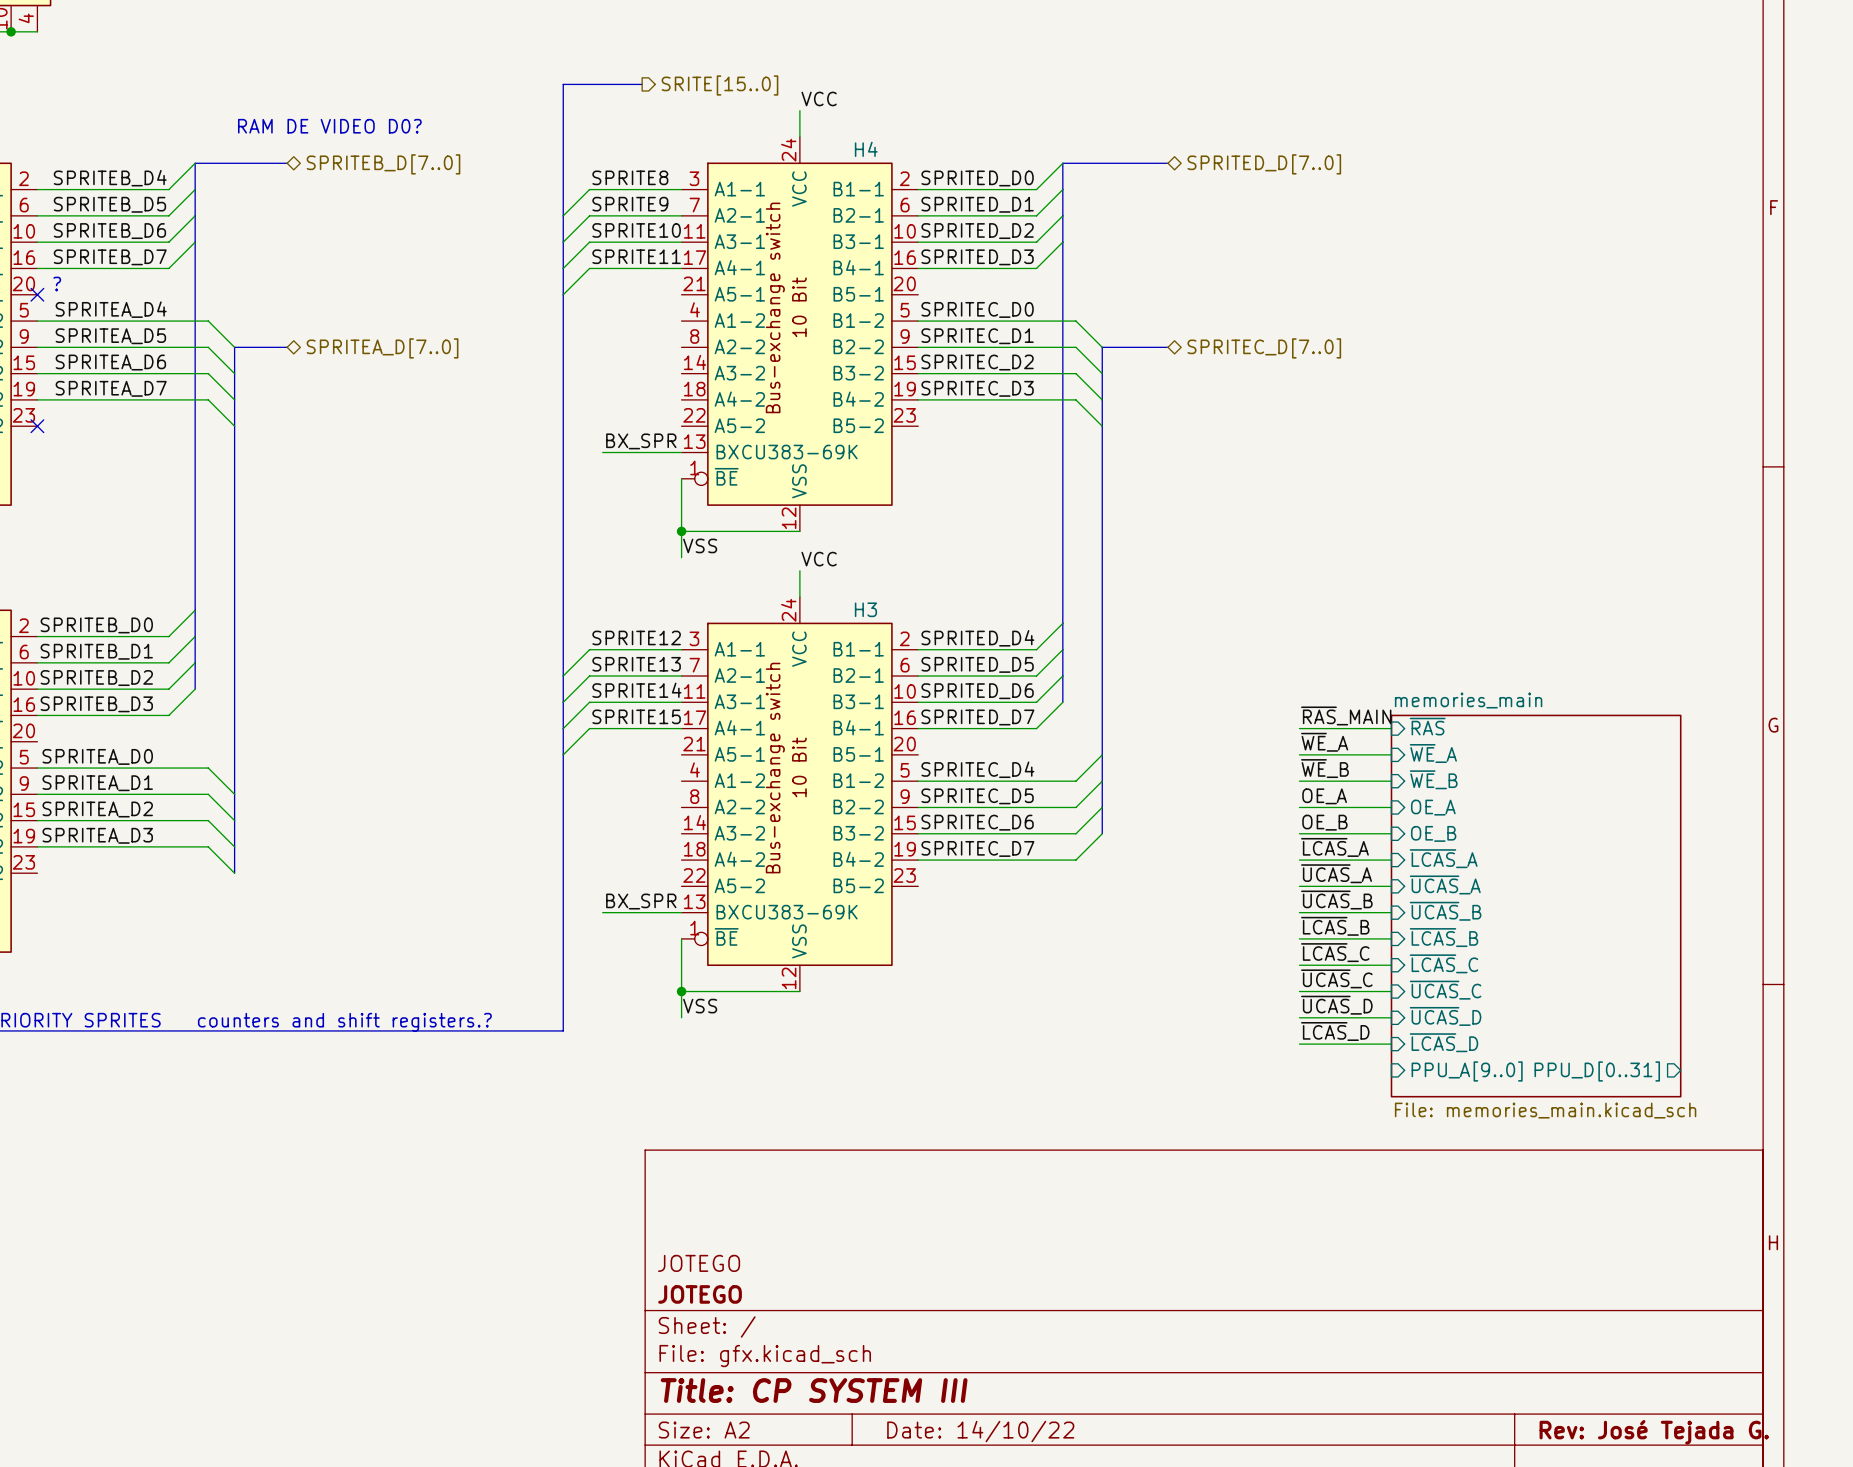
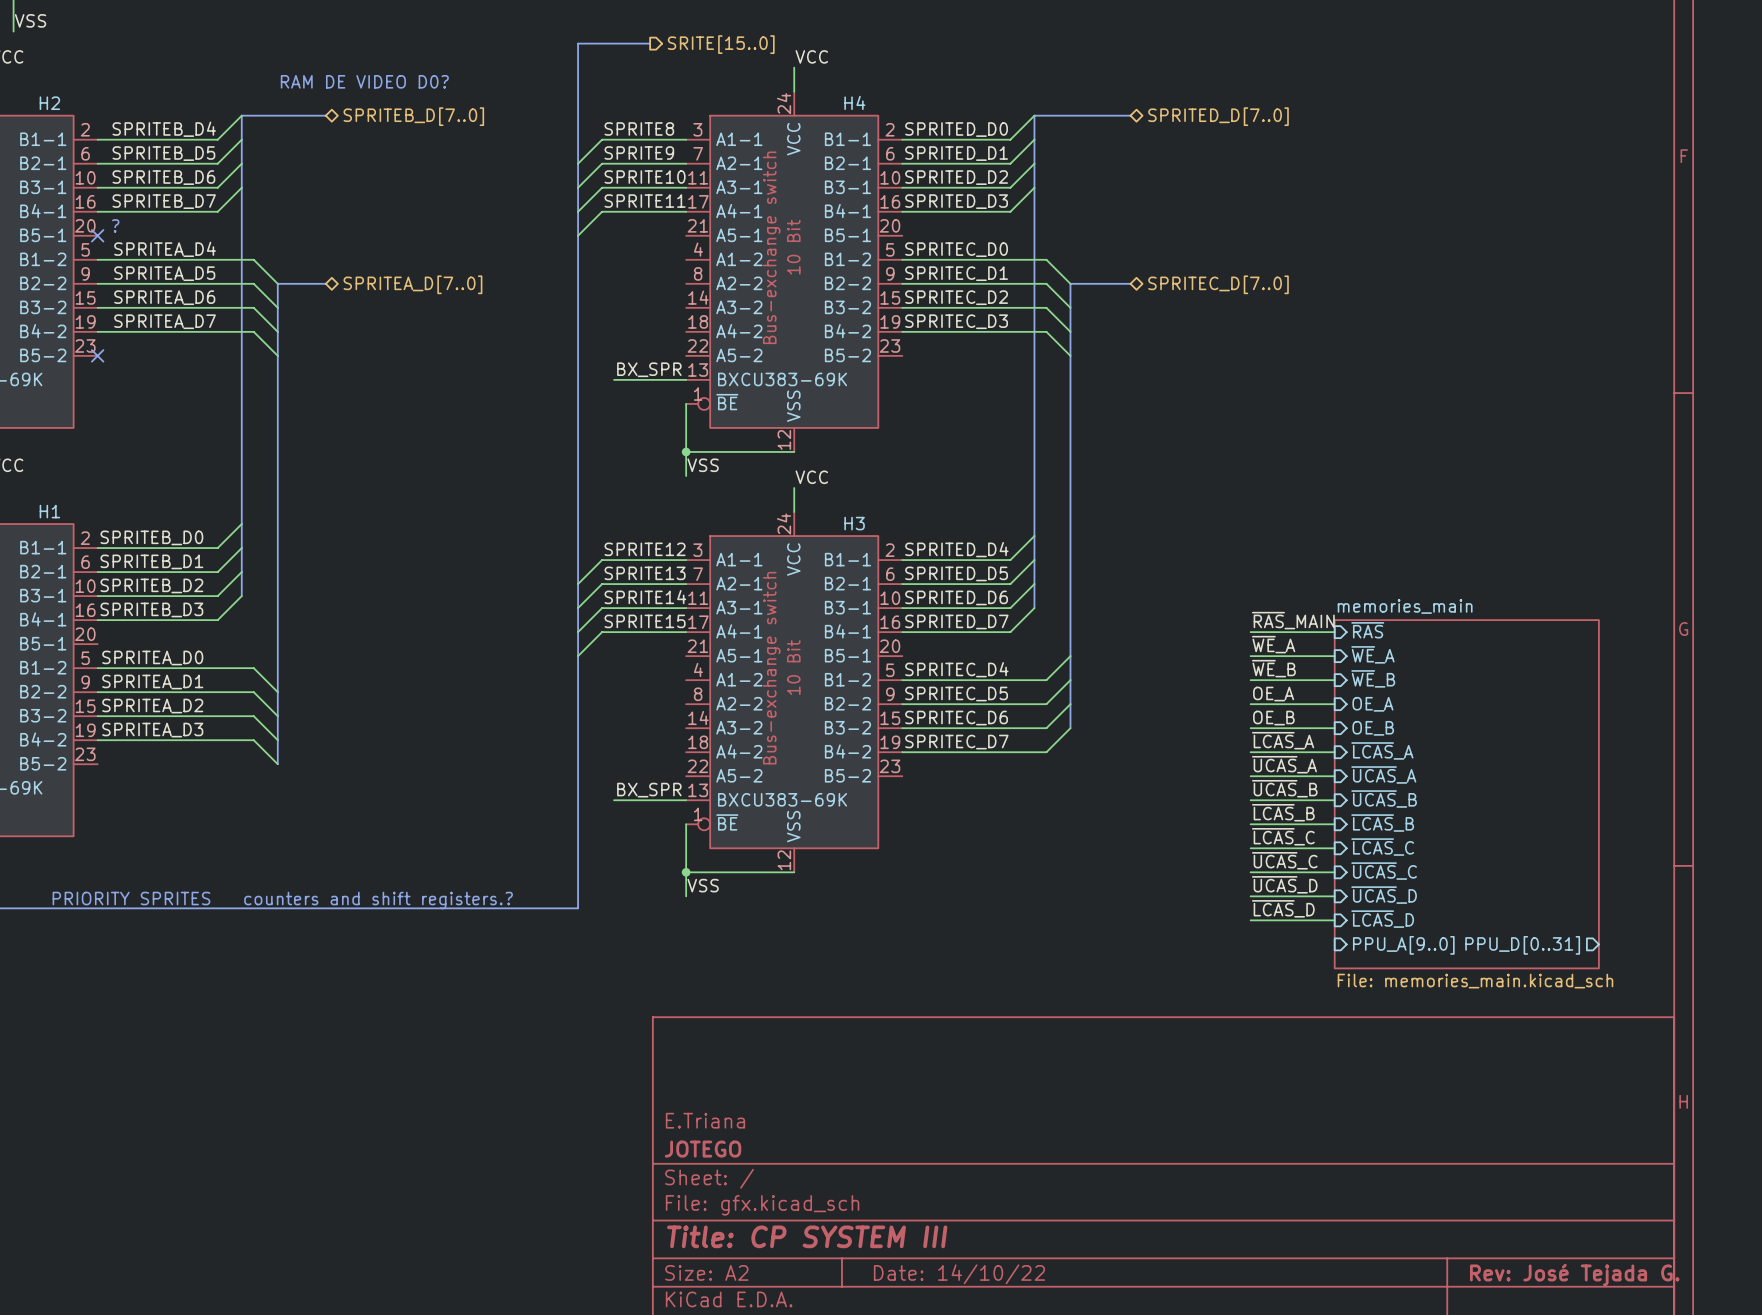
title block: JOTEGO (699, 1263) -> E.Triana (705, 1120)

